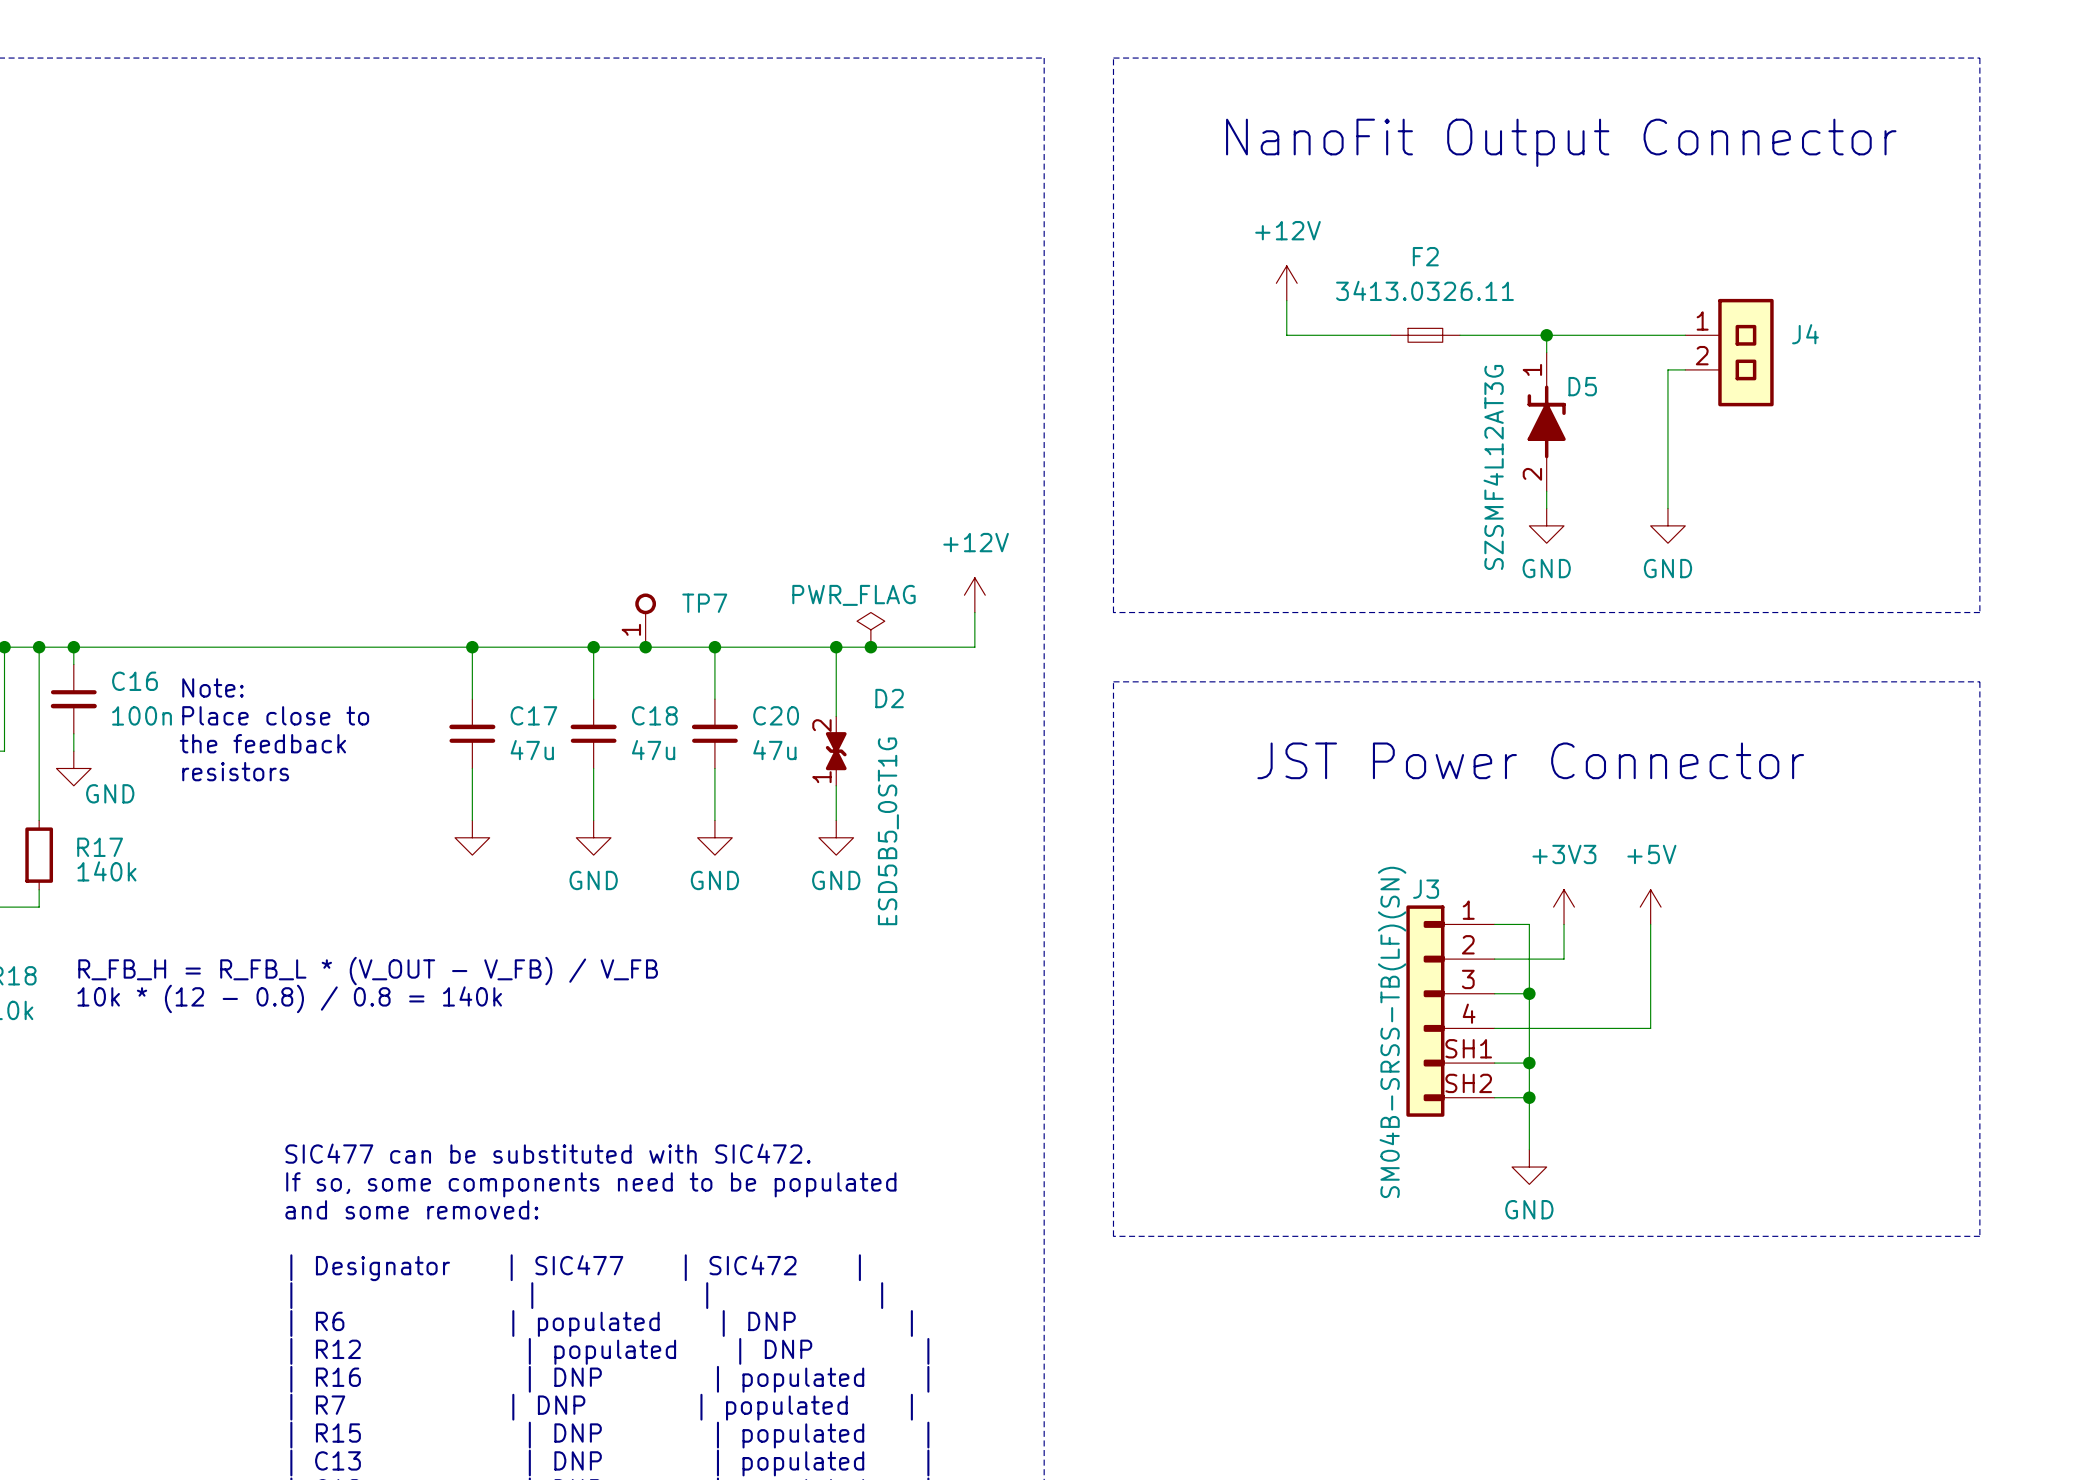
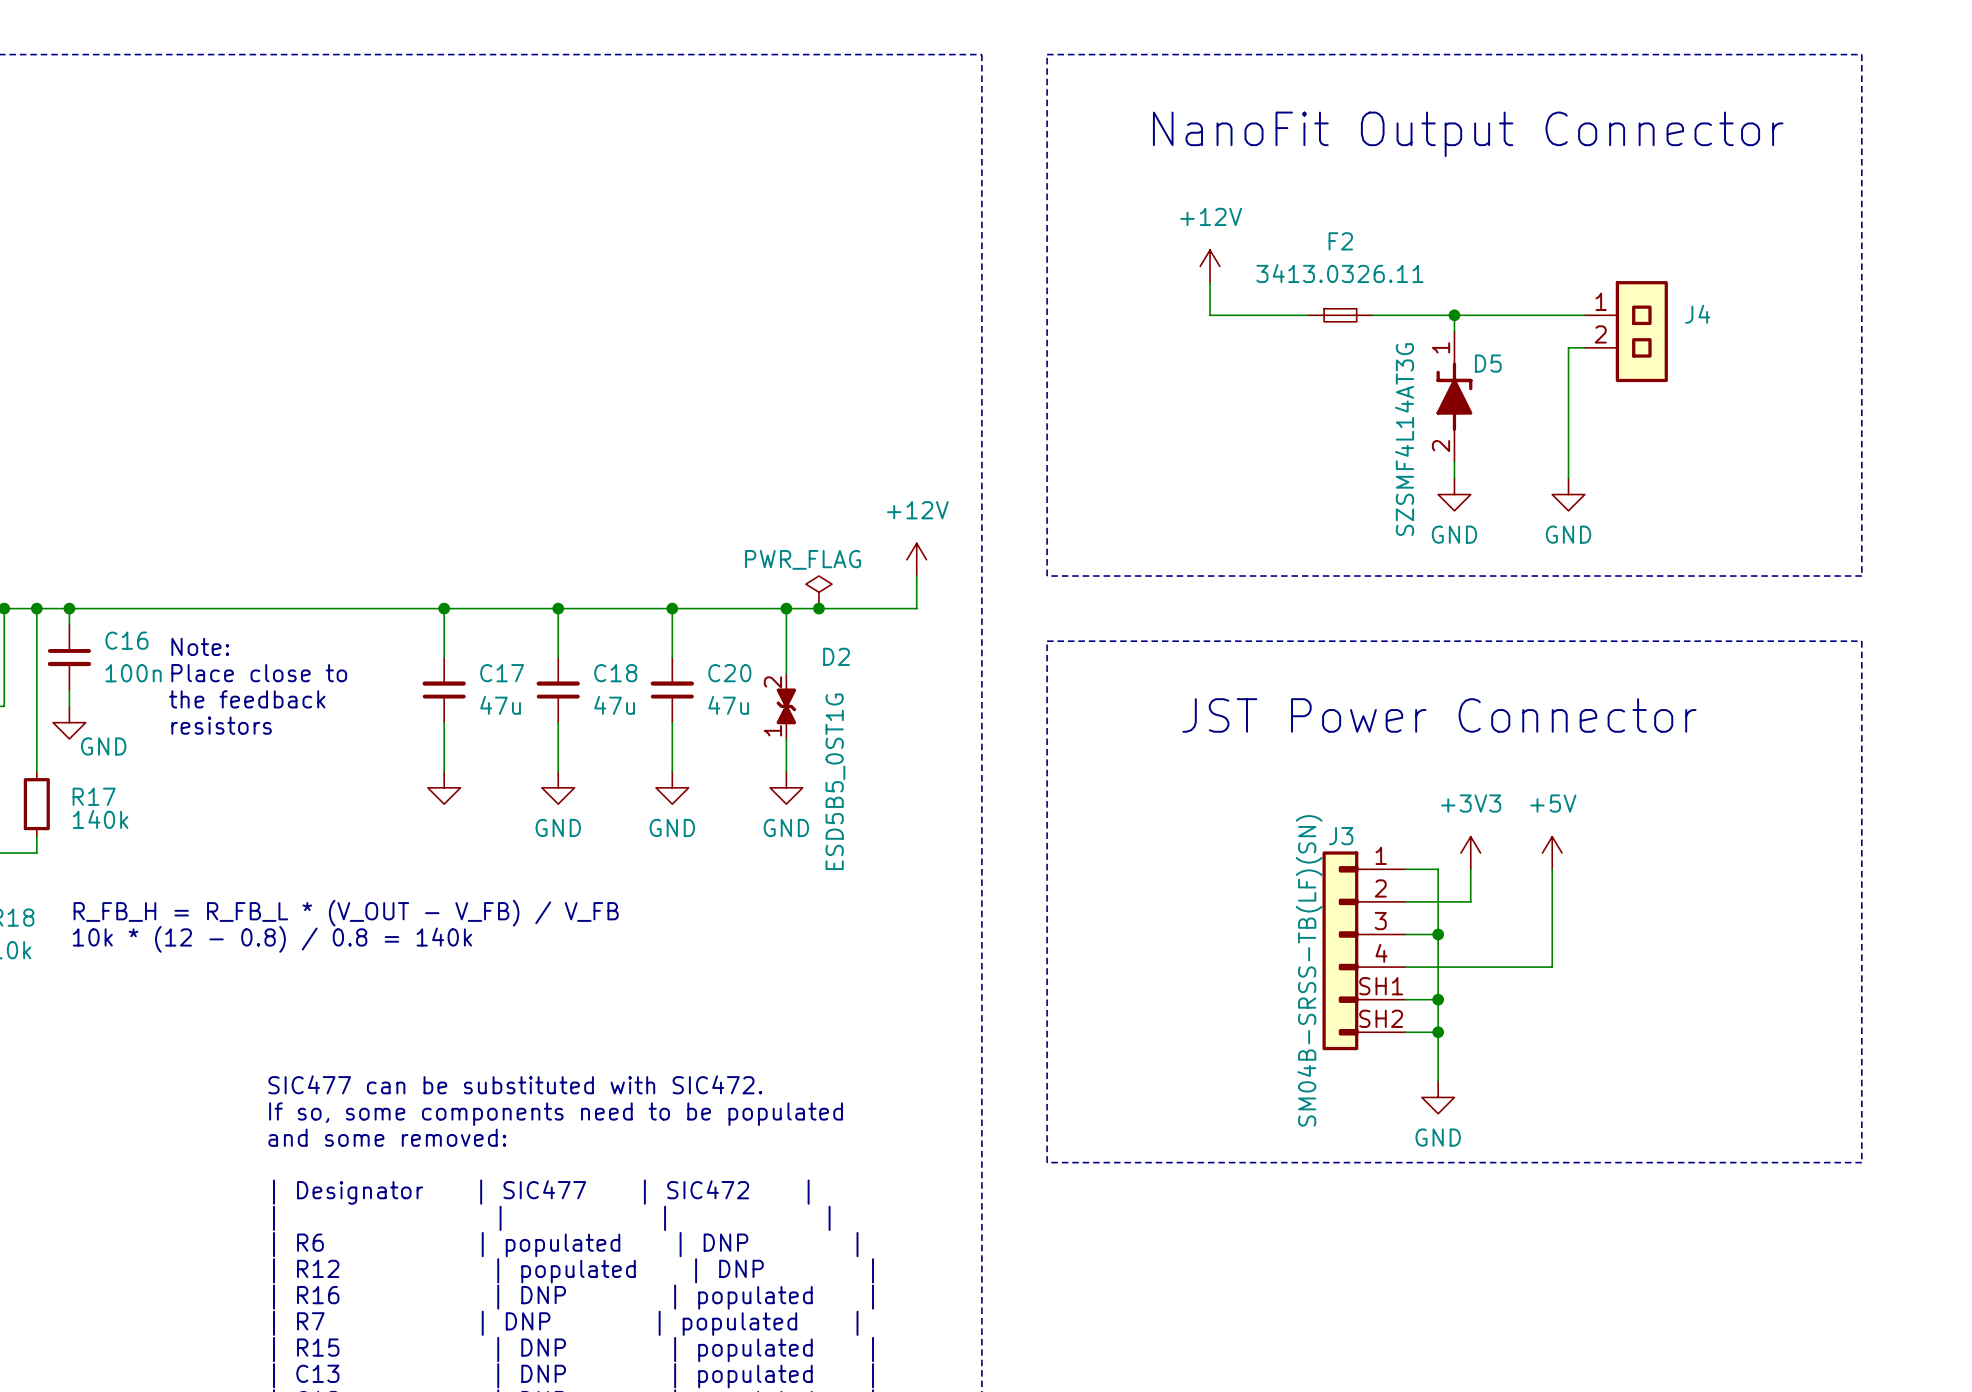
D5 text: SZSMF4L12AT3G (1493, 467) -> SZSMF4L14AT3G (1404, 439)
TP7: (645, 620) -> none
junction: (645, 647) -> none

